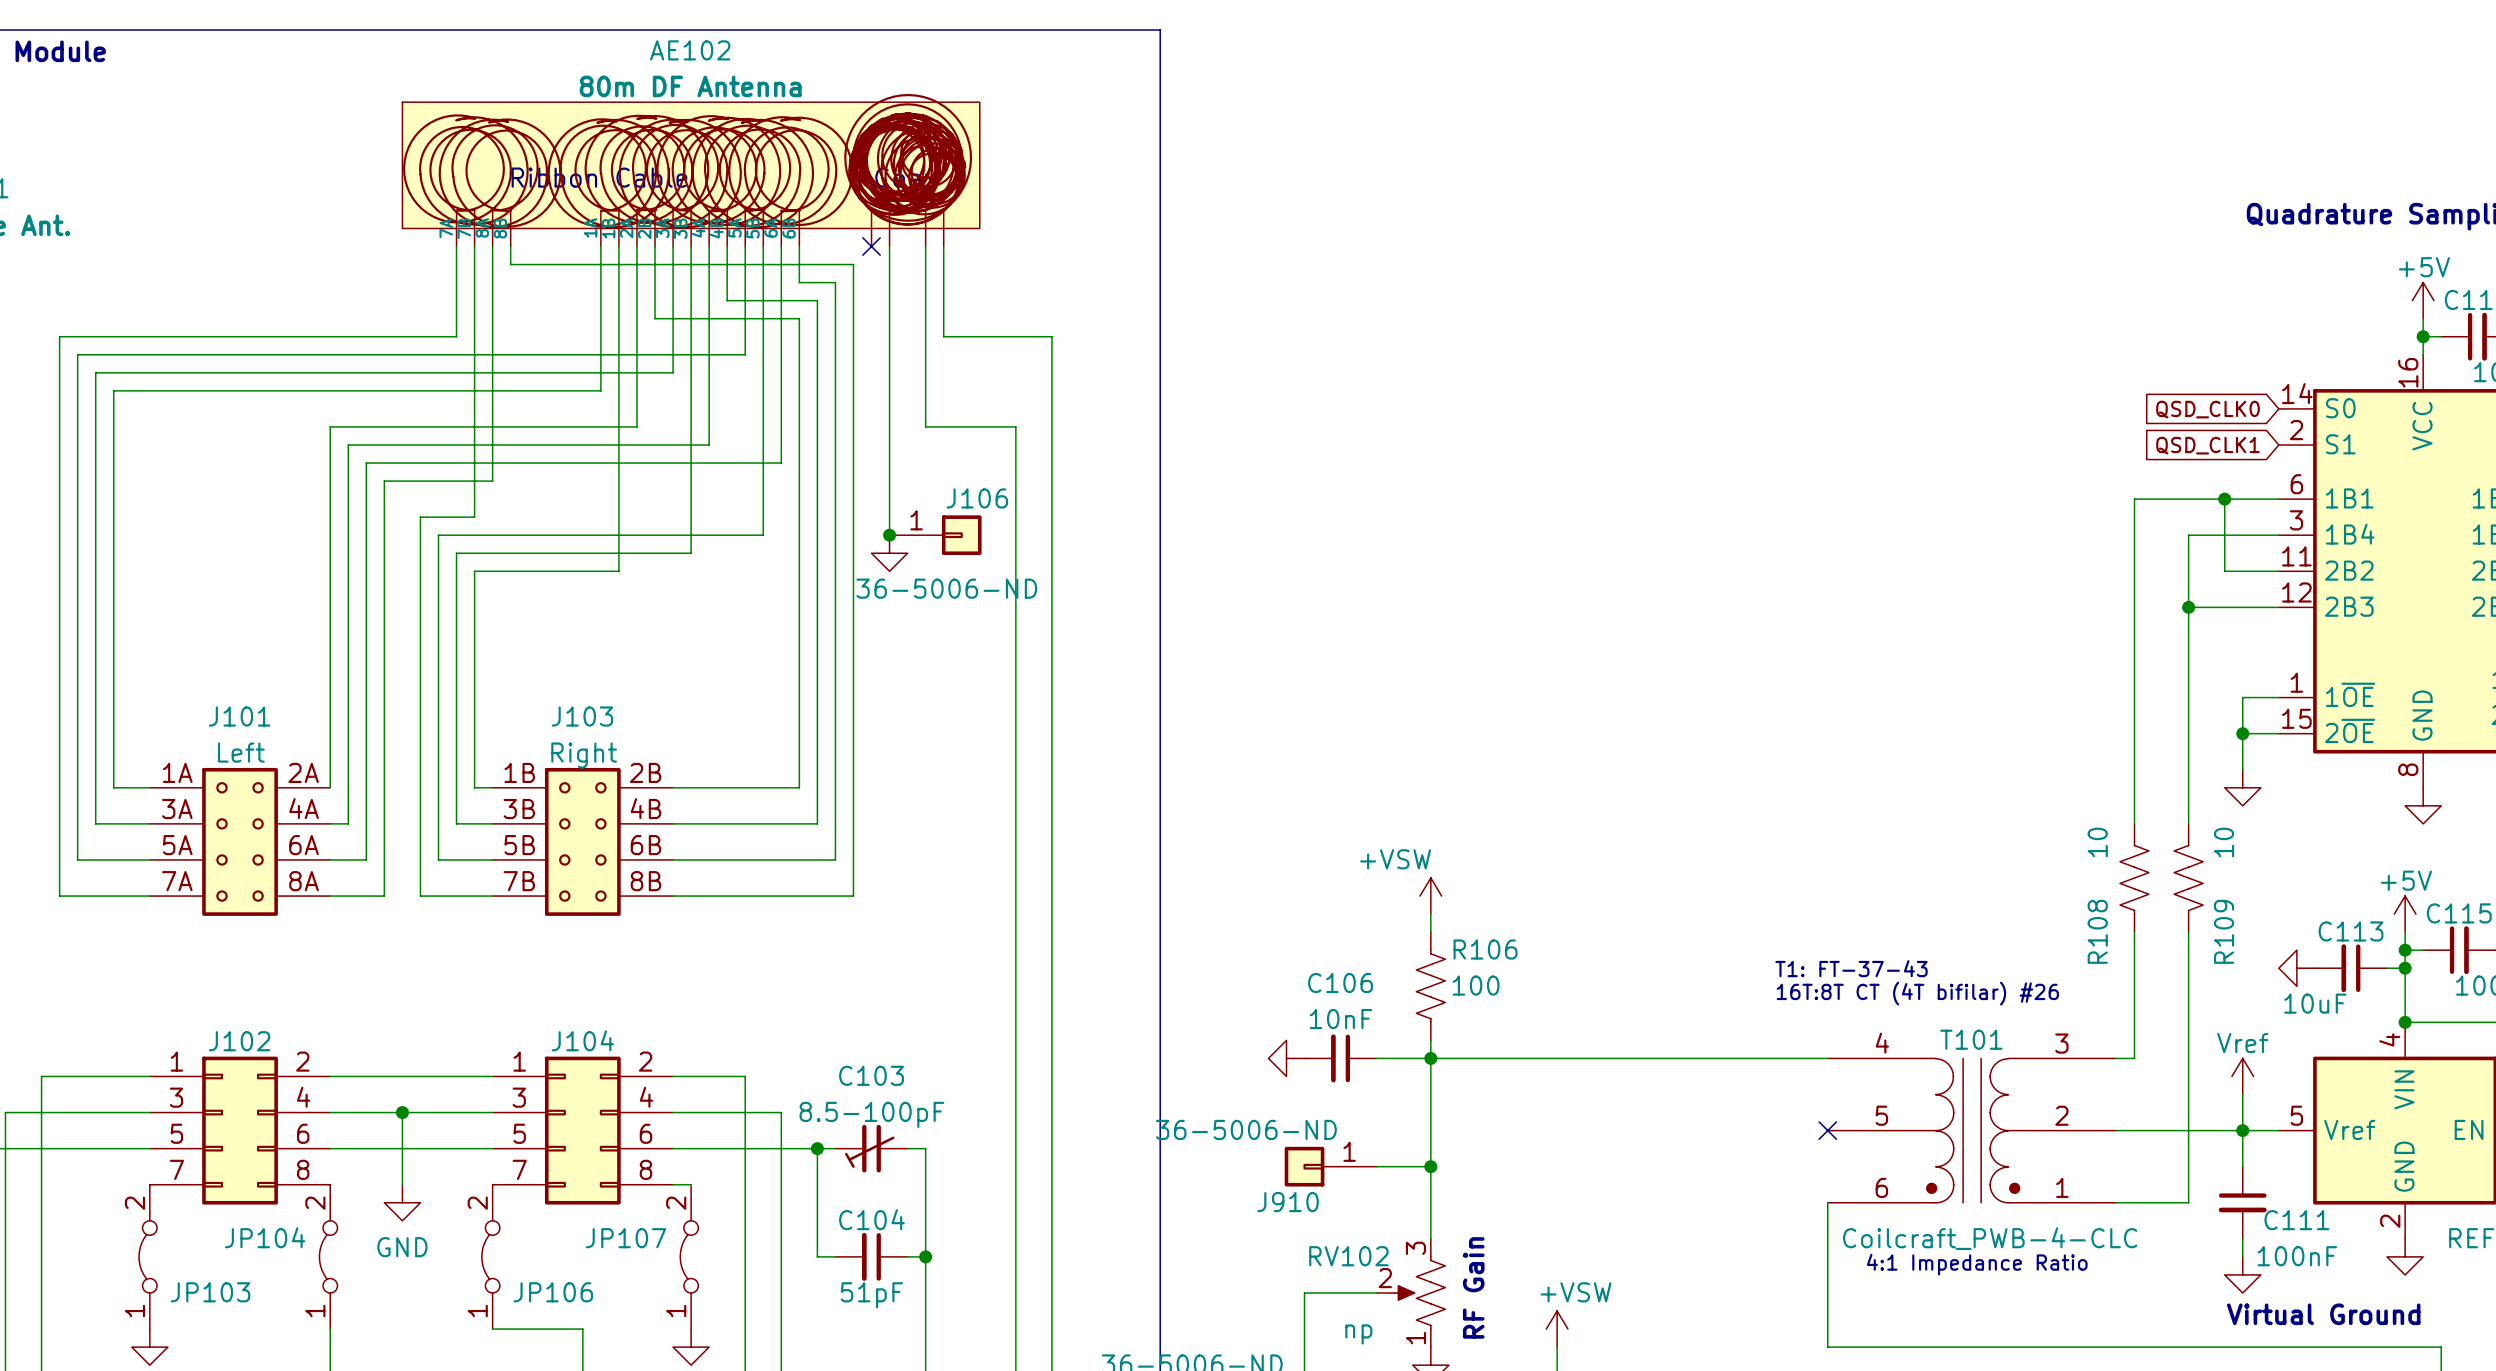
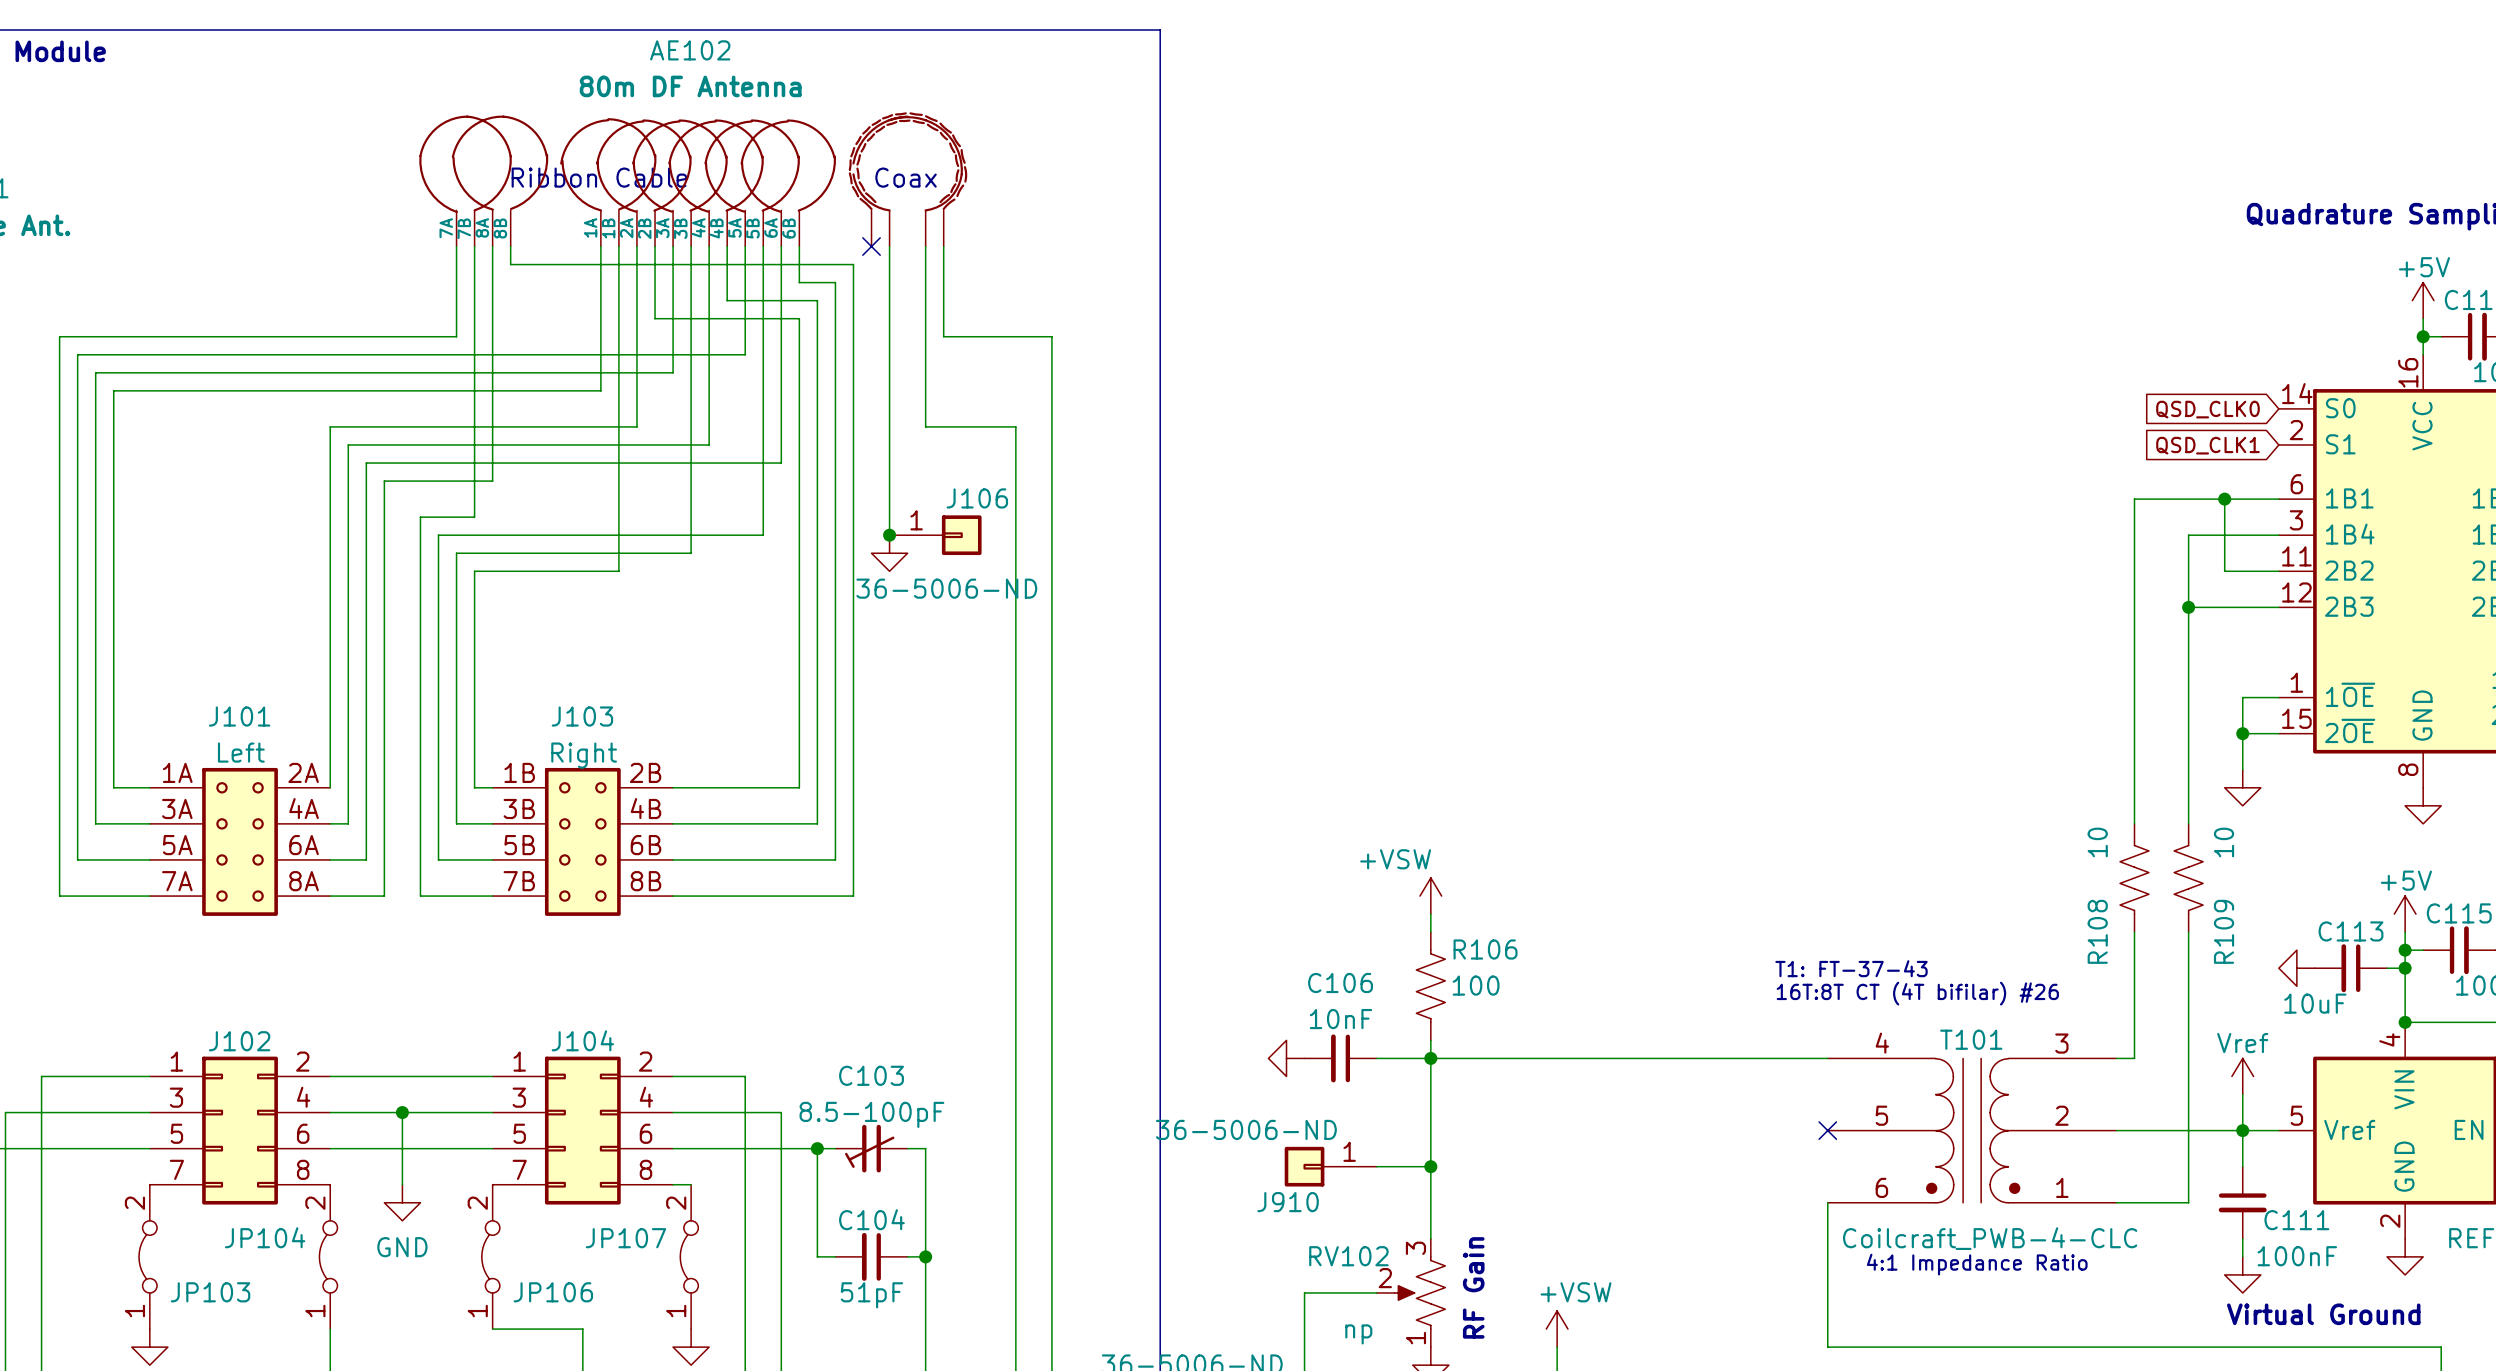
AE102 symbol: [402, 93, 981, 247] -> [419, 112, 968, 247]

